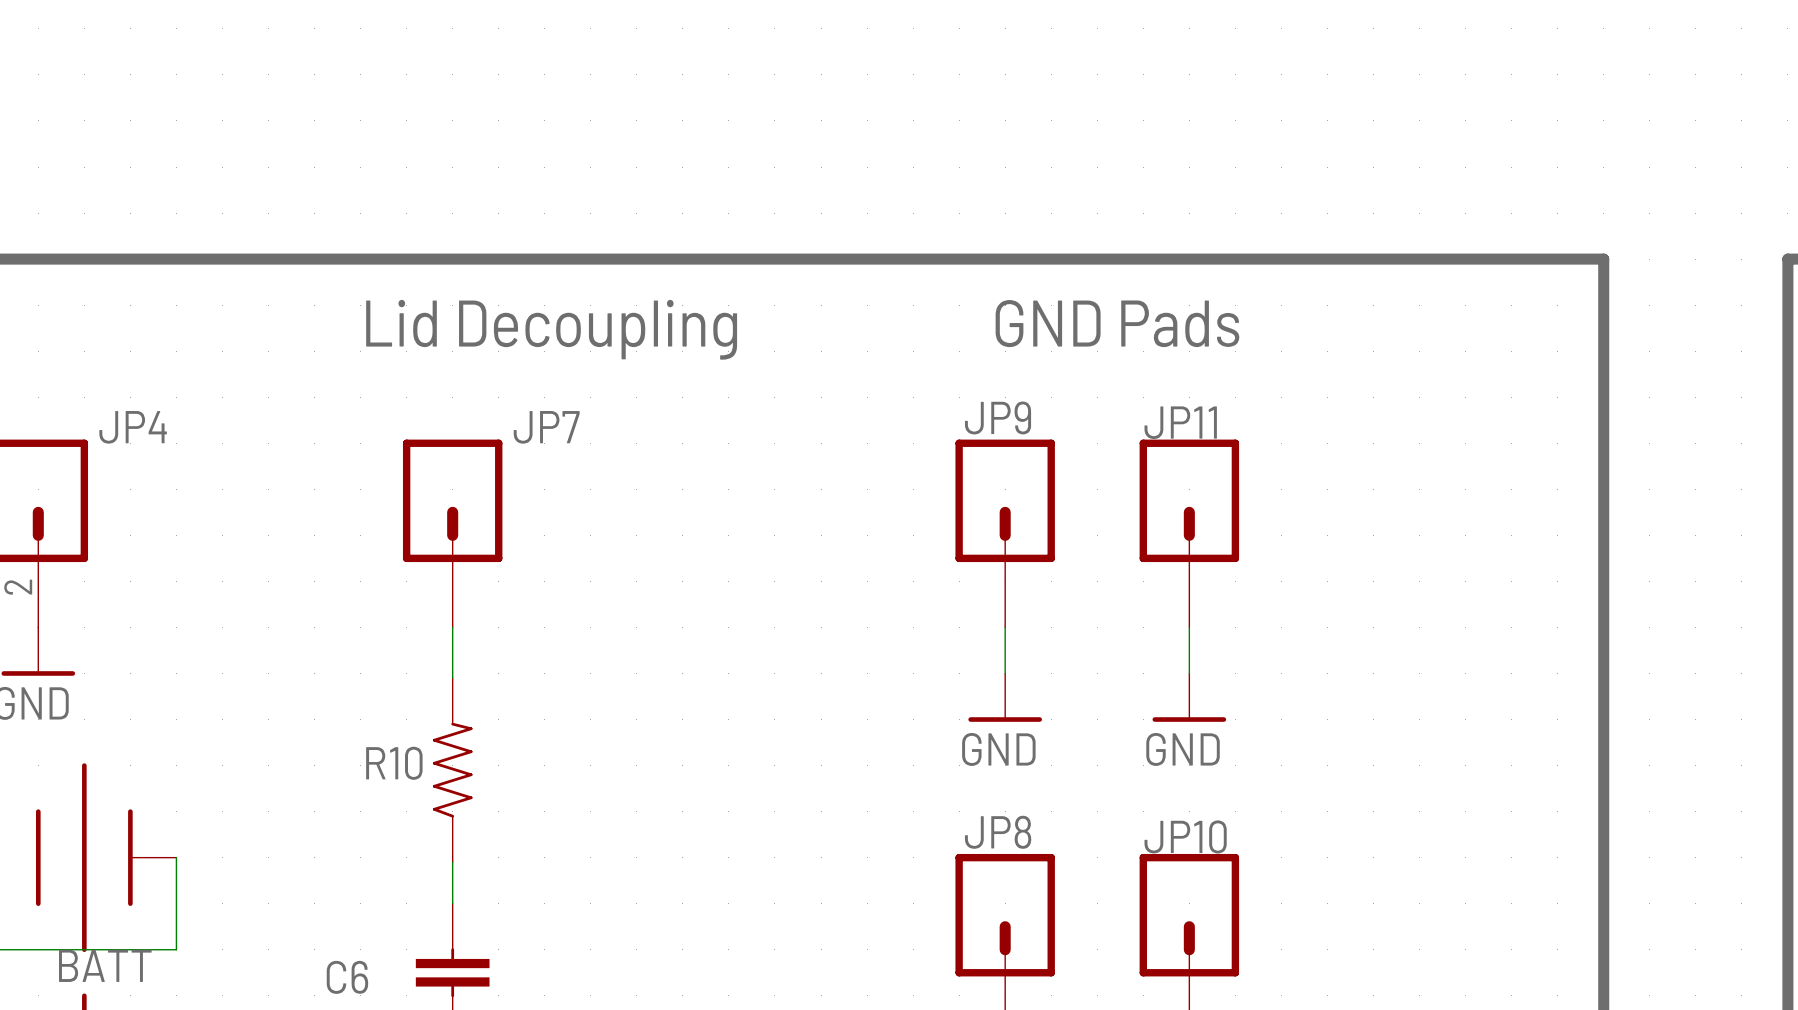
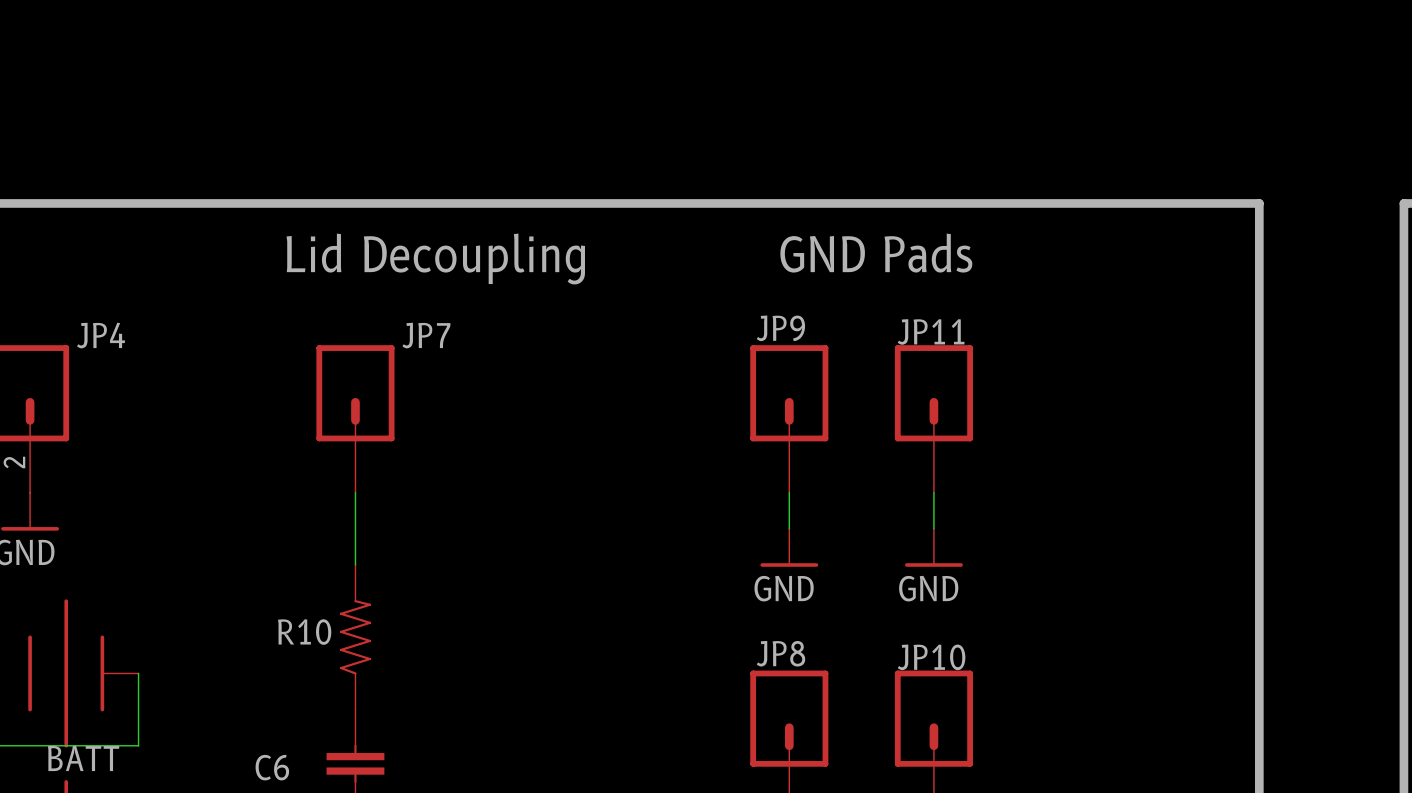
R10 position: (452, 770) -> (355, 637)

